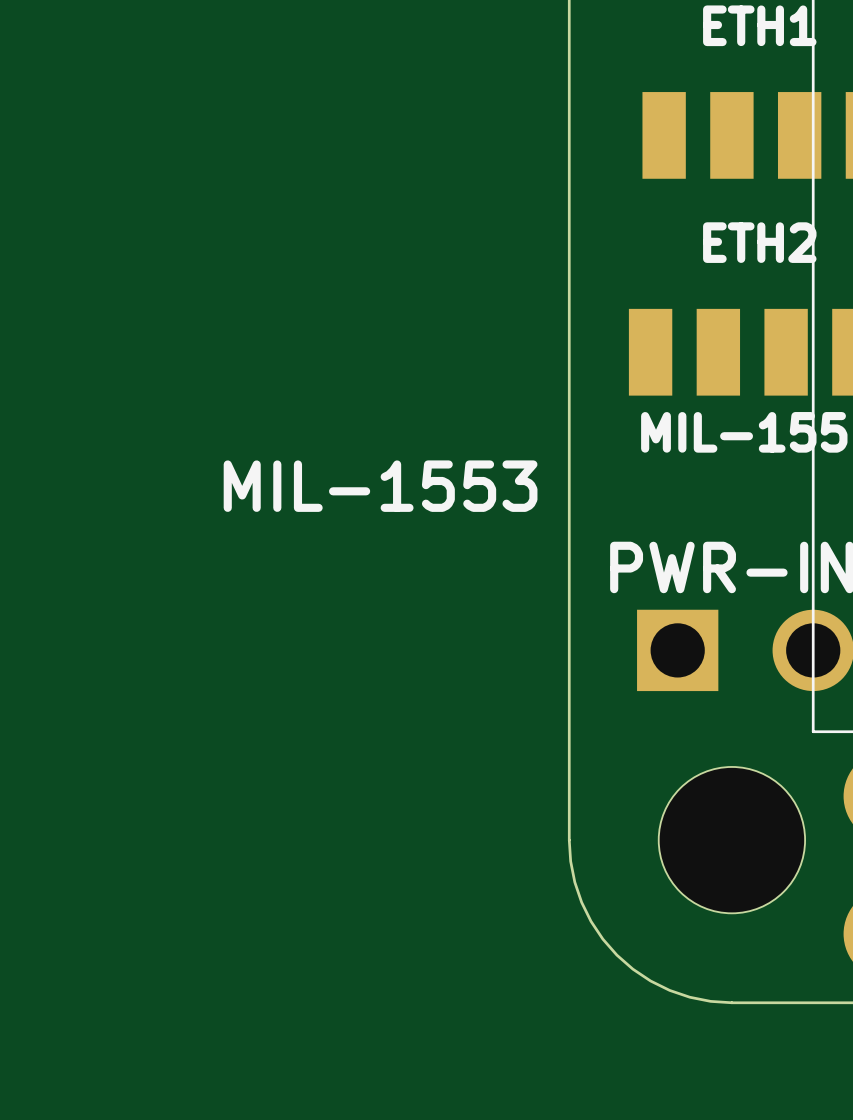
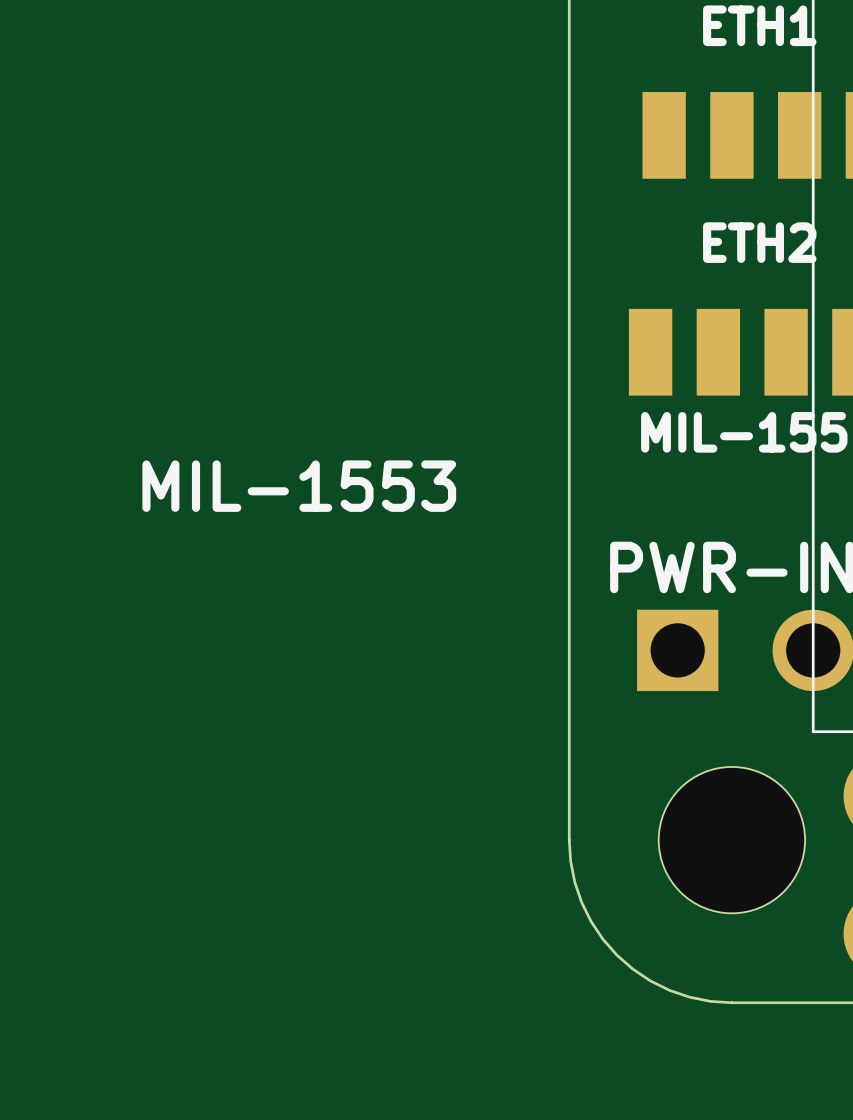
text position: MIL-1553 (380, 486) -> MIL-1553 (299, 486)

